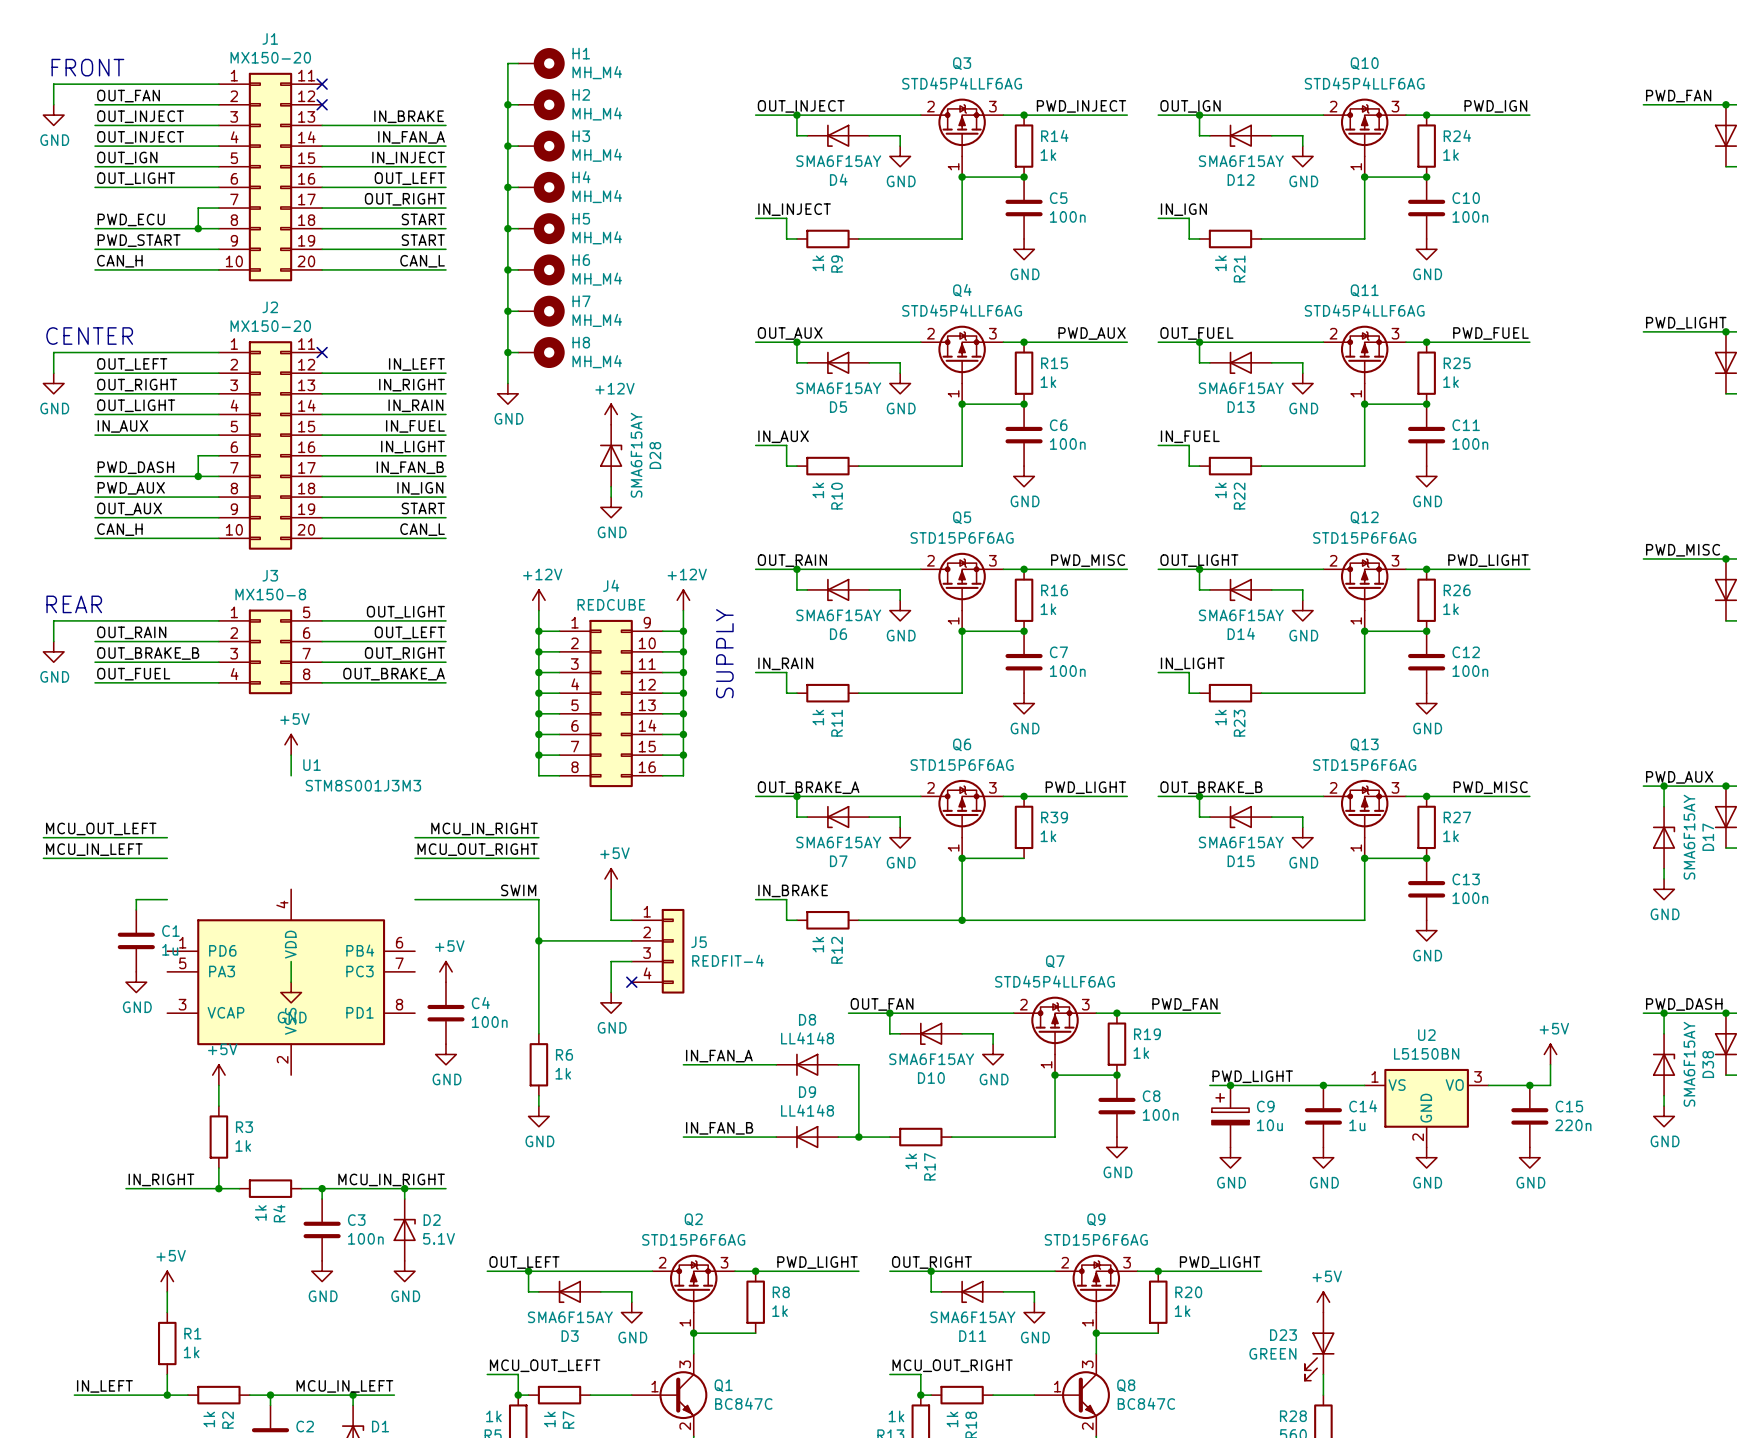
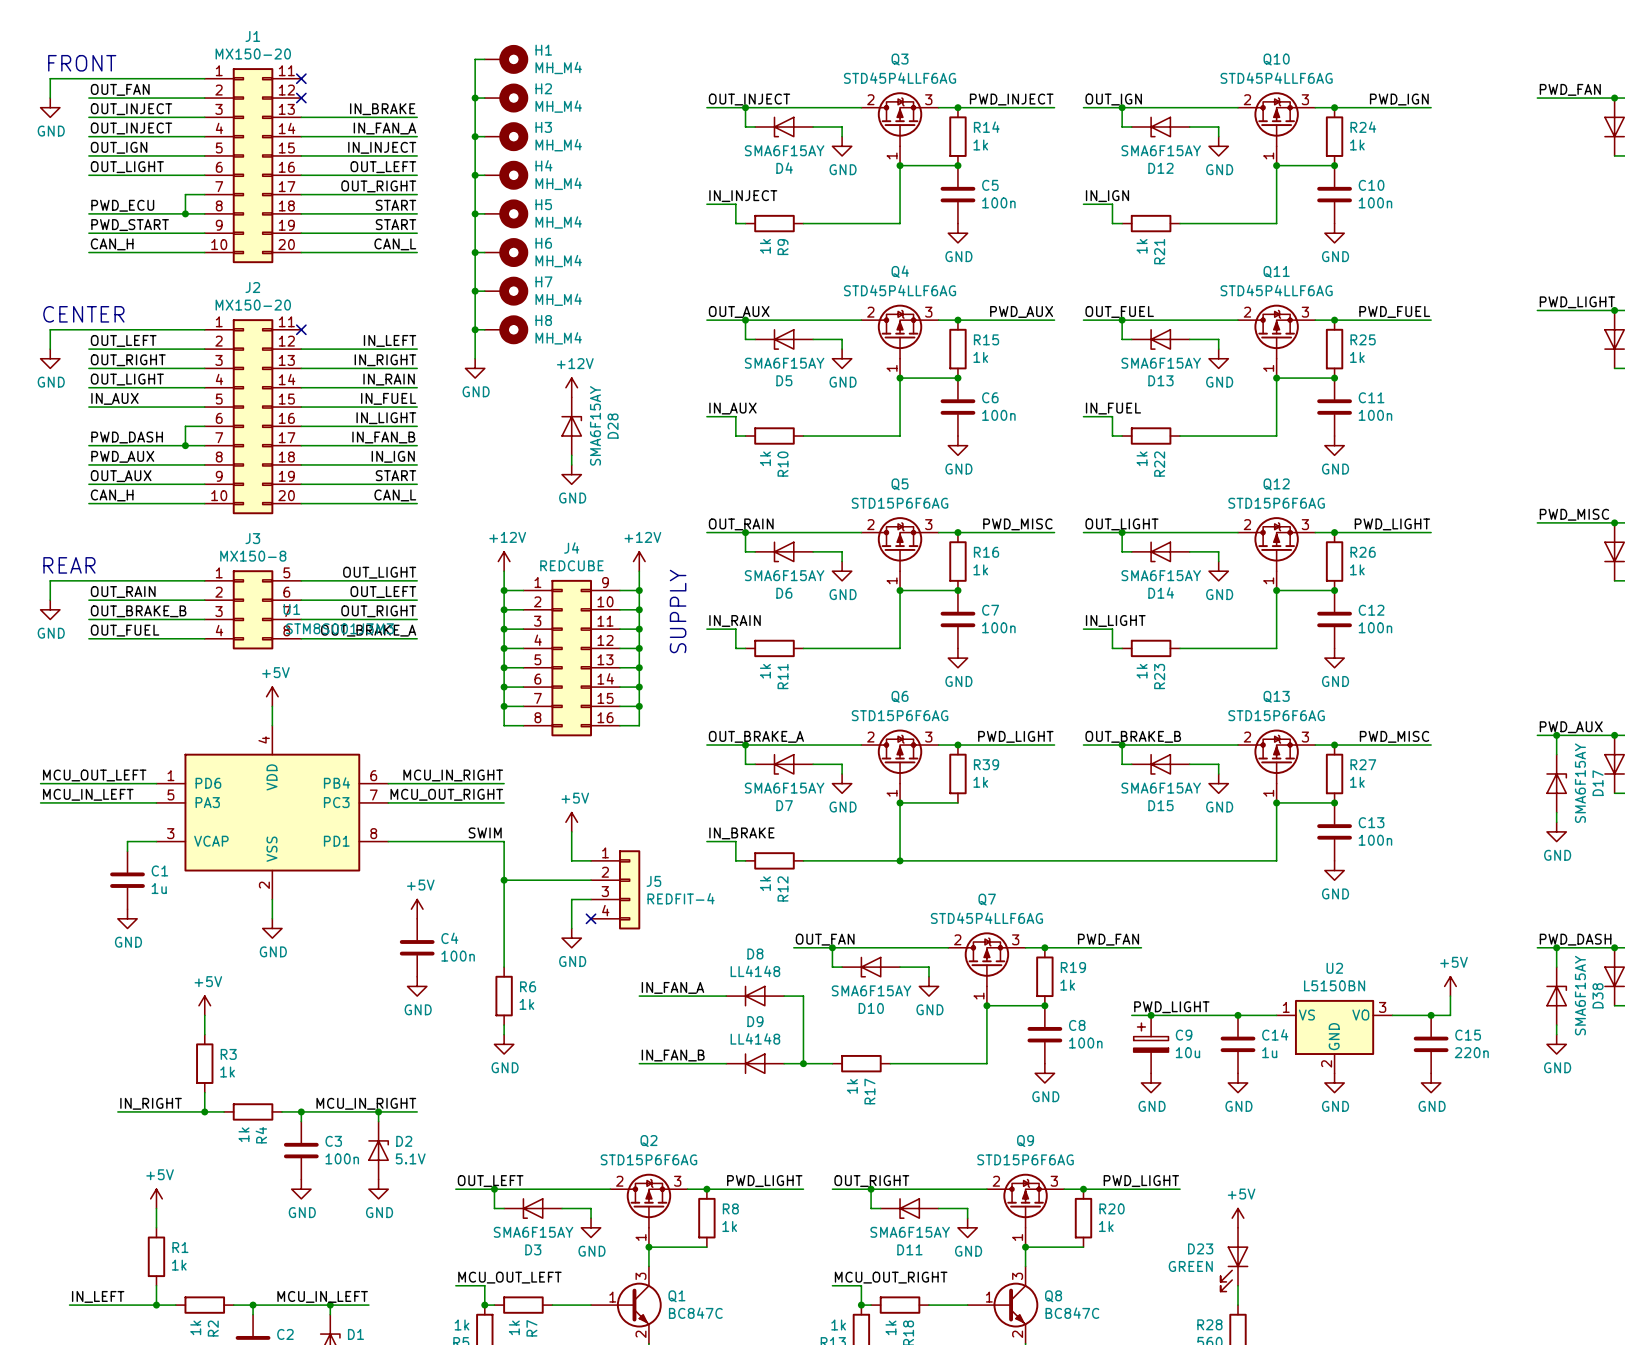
U1 position: (291, 982) -> (272, 812)

